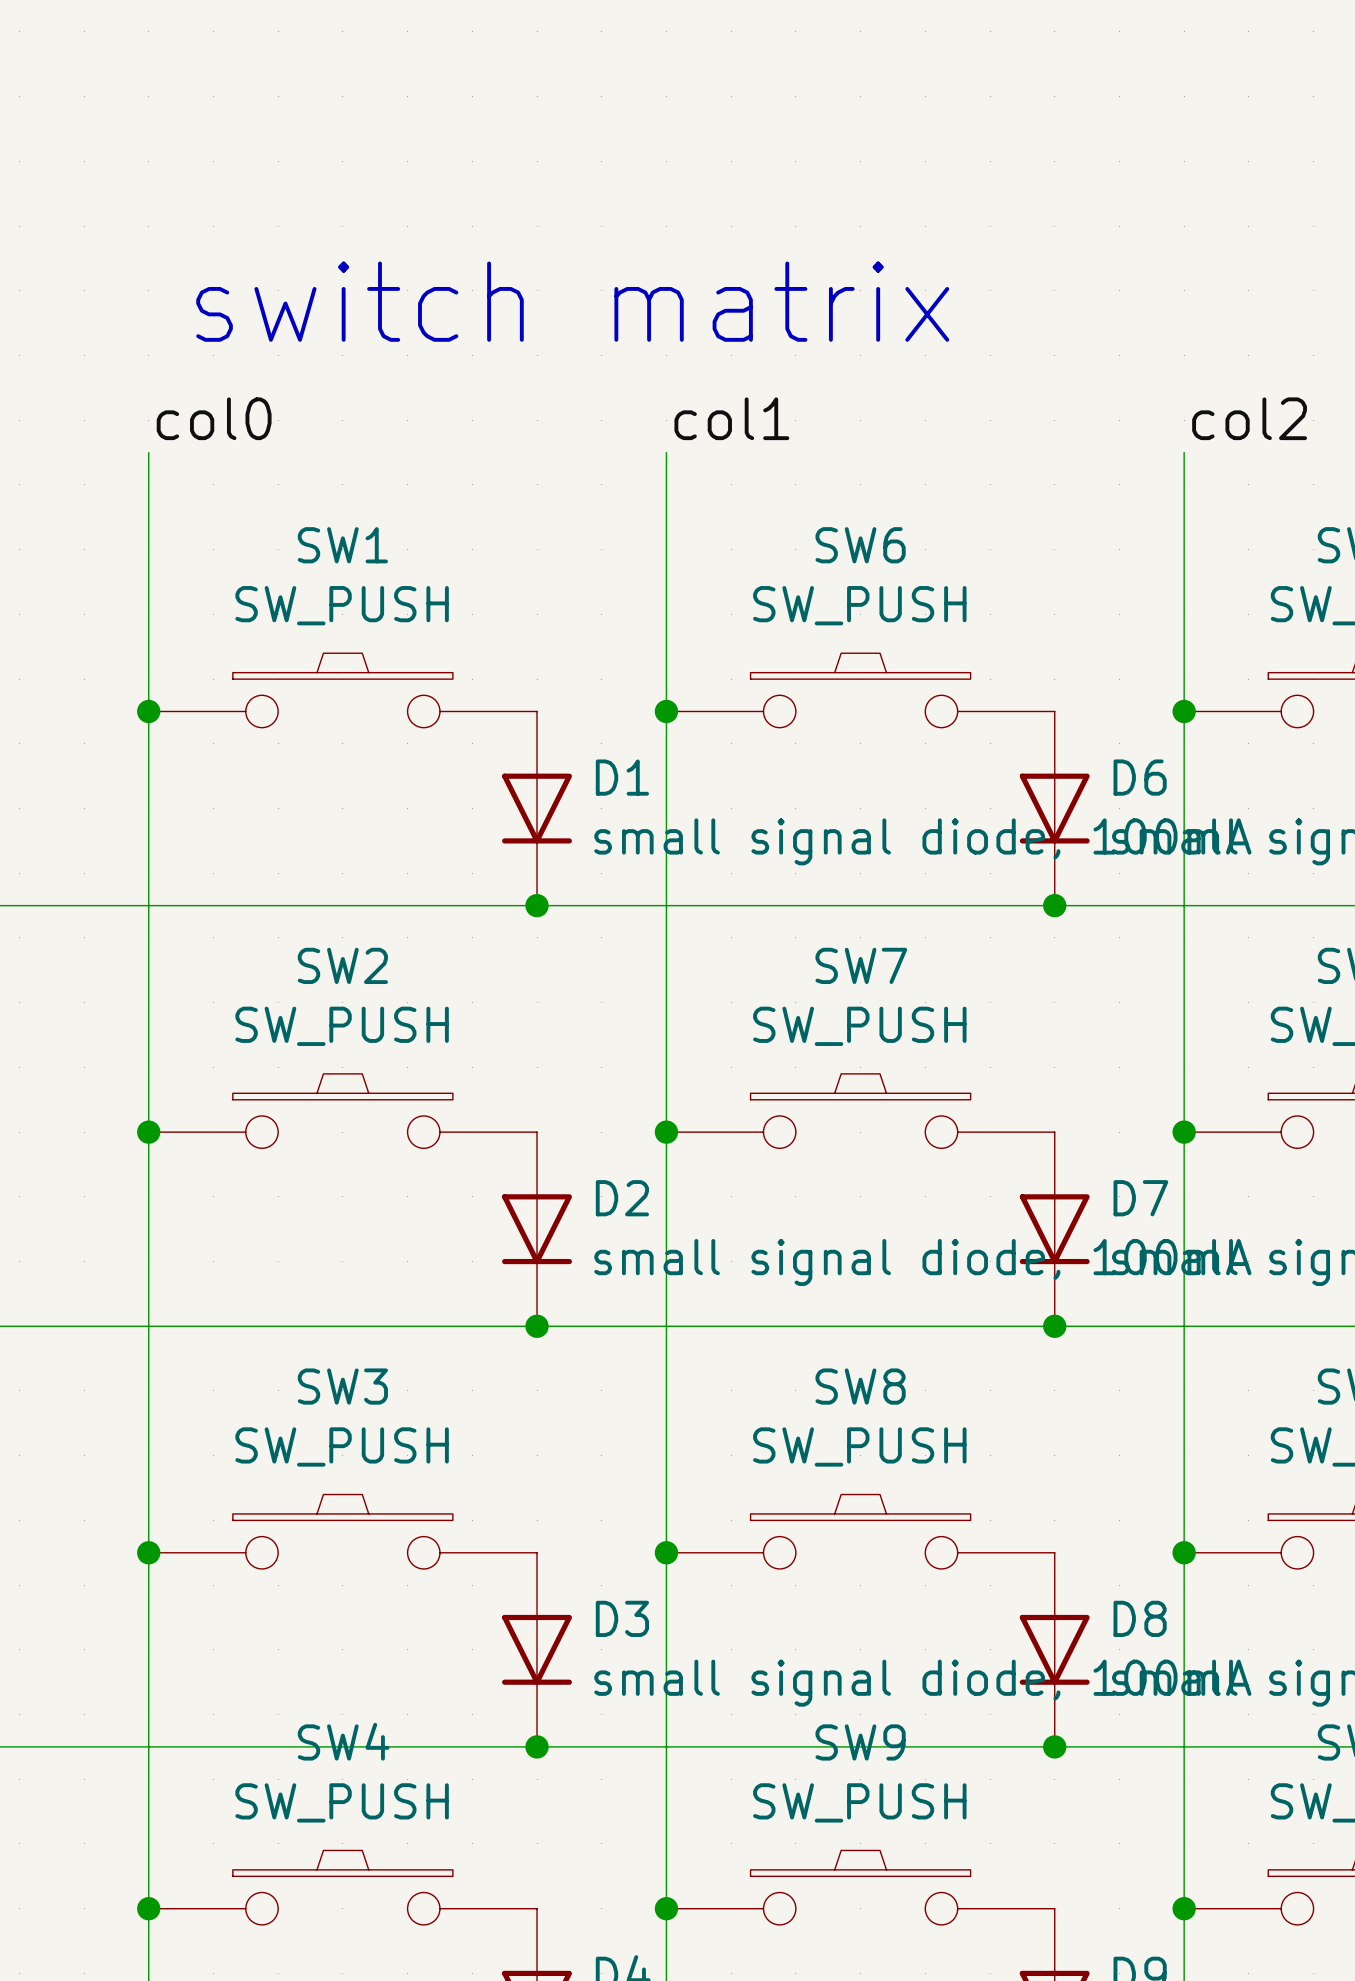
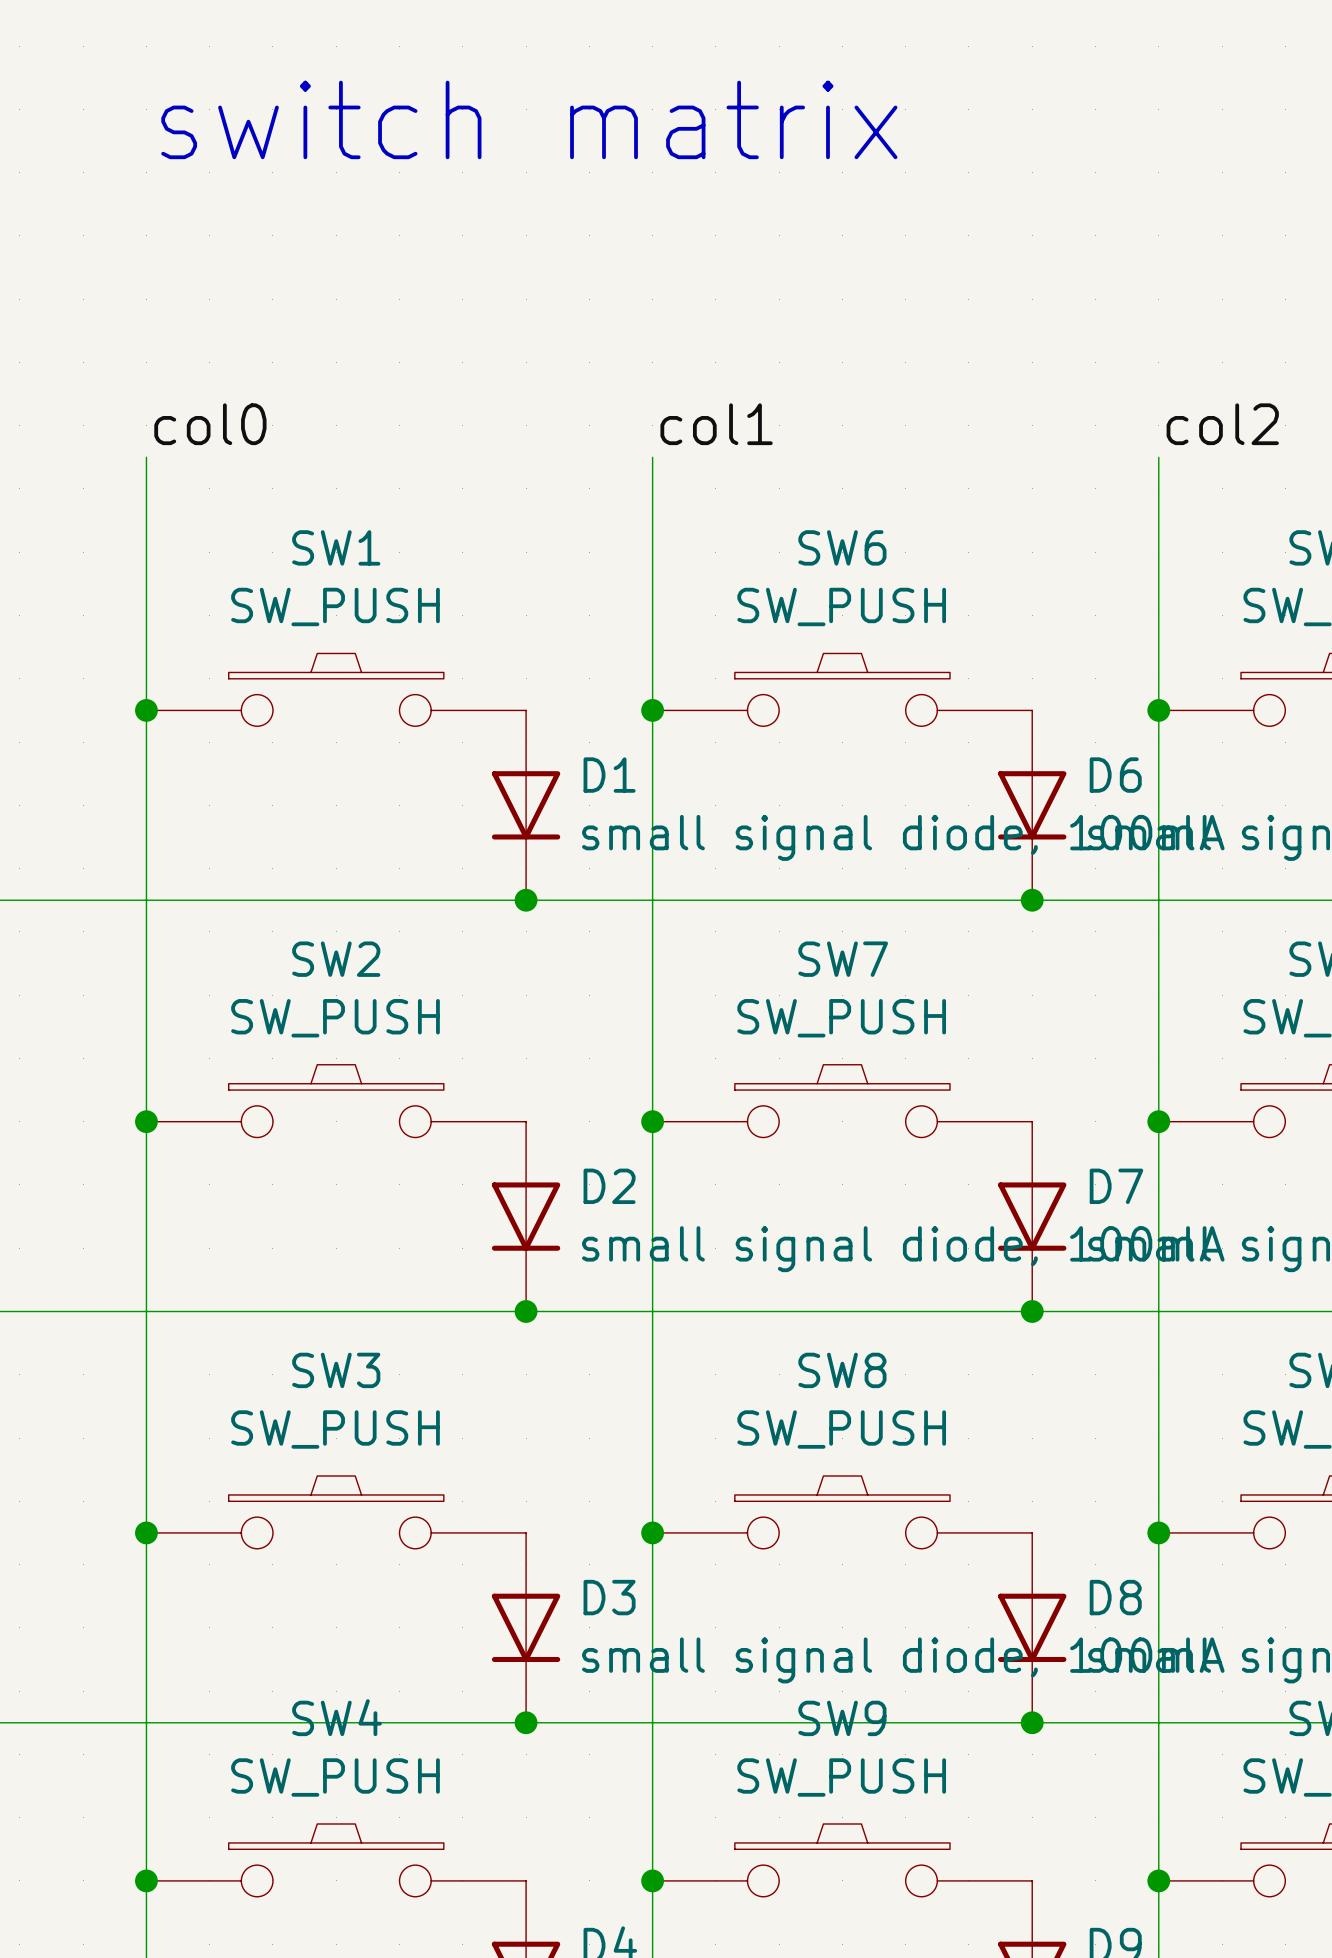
text position: switch matrix (572, 301) -> switch matrix (529, 119)

